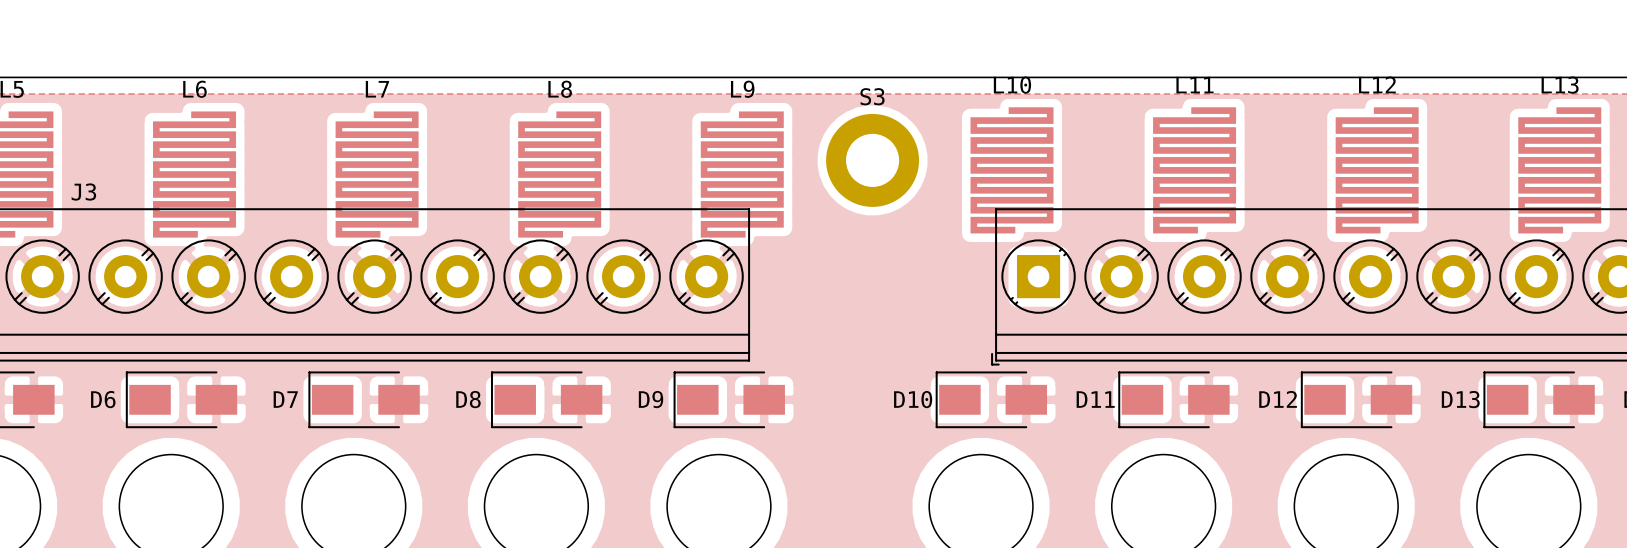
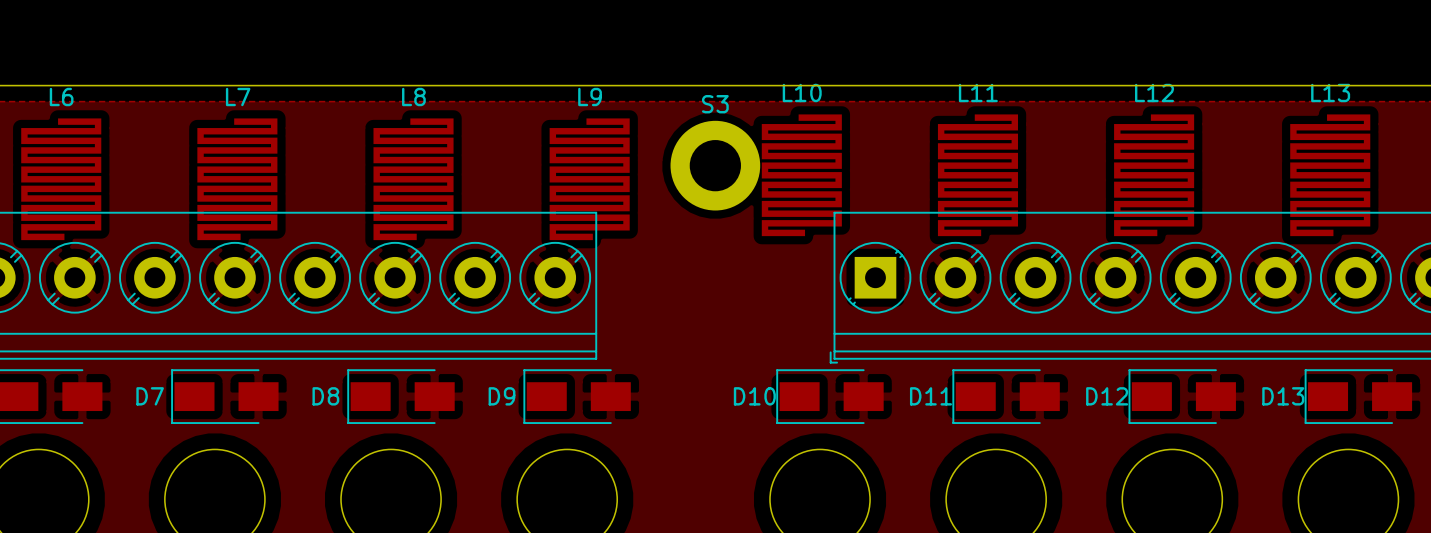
L10 position: (1012, 170) -> (801, 175)
L11 position: (1194, 170) -> (977, 175)
L12 position: (1377, 170) -> (1154, 175)
L13 position: (1559, 170) -> (1330, 175)

